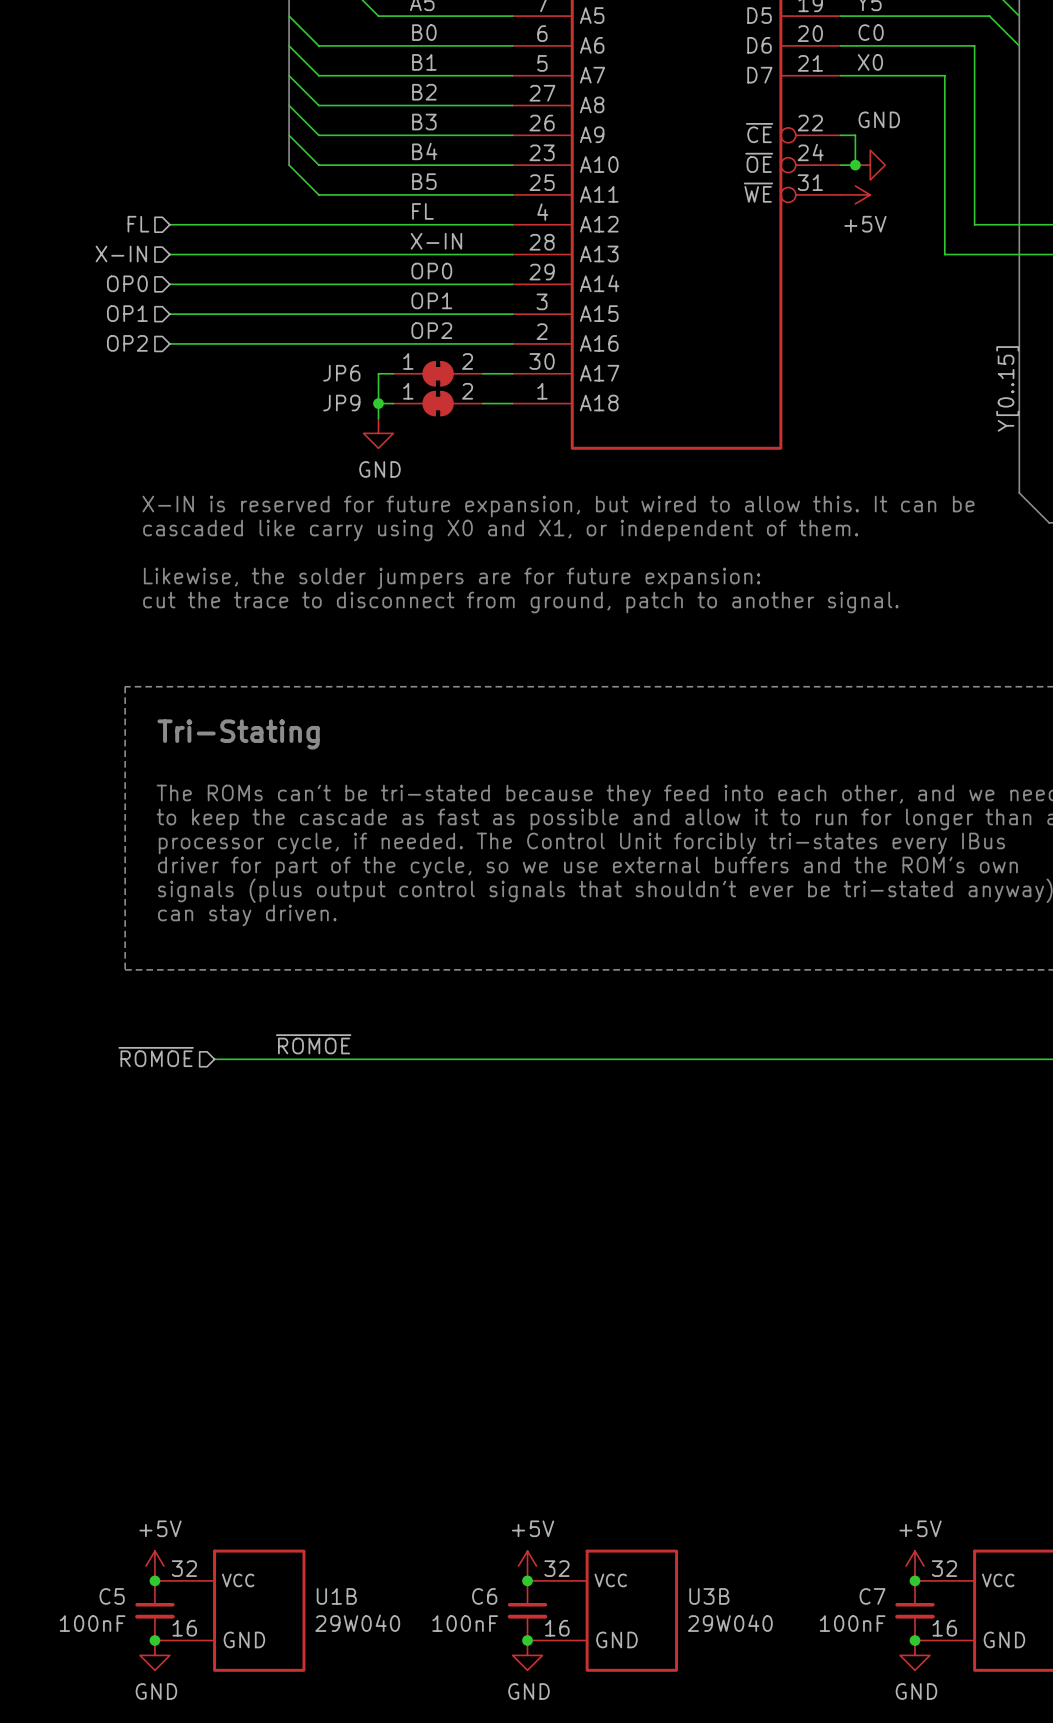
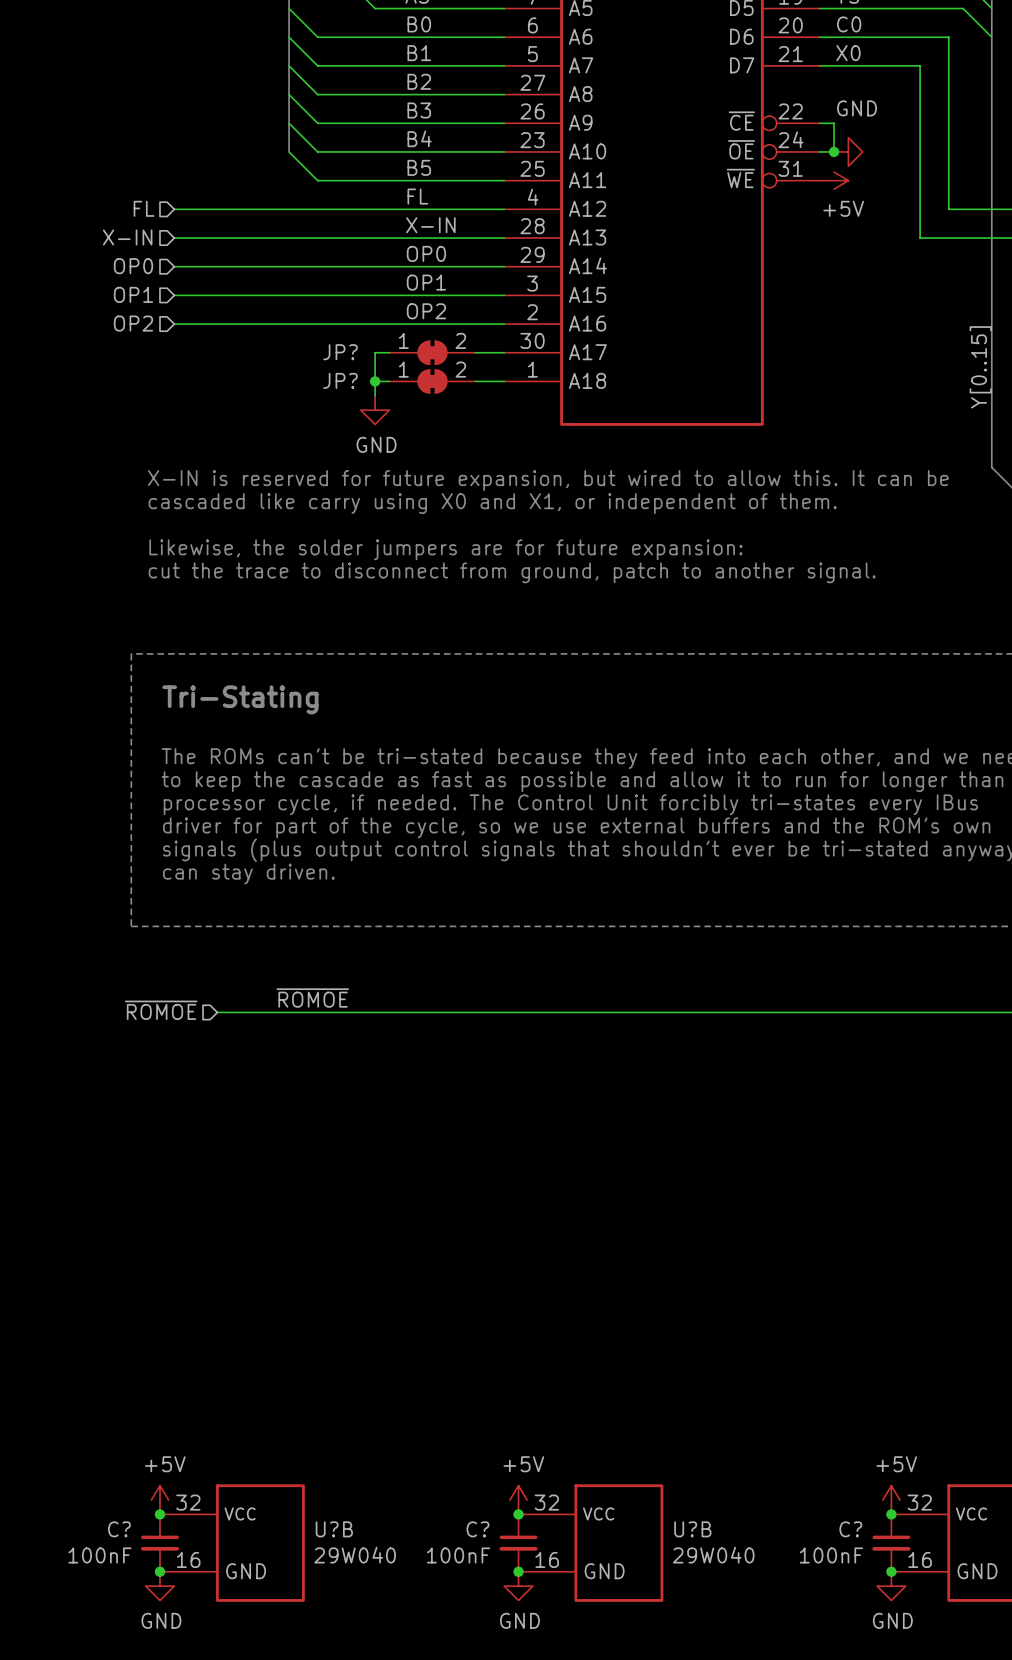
JP6 name: JP6 (341, 373) -> JP? (340, 352)
JP9 name: JP9 (341, 403) -> JP? (340, 380)
C5 name: C5 (112, 1596) -> C? (119, 1529)
U1B name: U1B (336, 1596) -> U?B (334, 1529)
C6 name: C6 (484, 1596) -> C? (477, 1529)
U3B name: U3B (709, 1596) -> U?B (692, 1529)
C7 name: C7 (872, 1596) -> C? (850, 1529)

